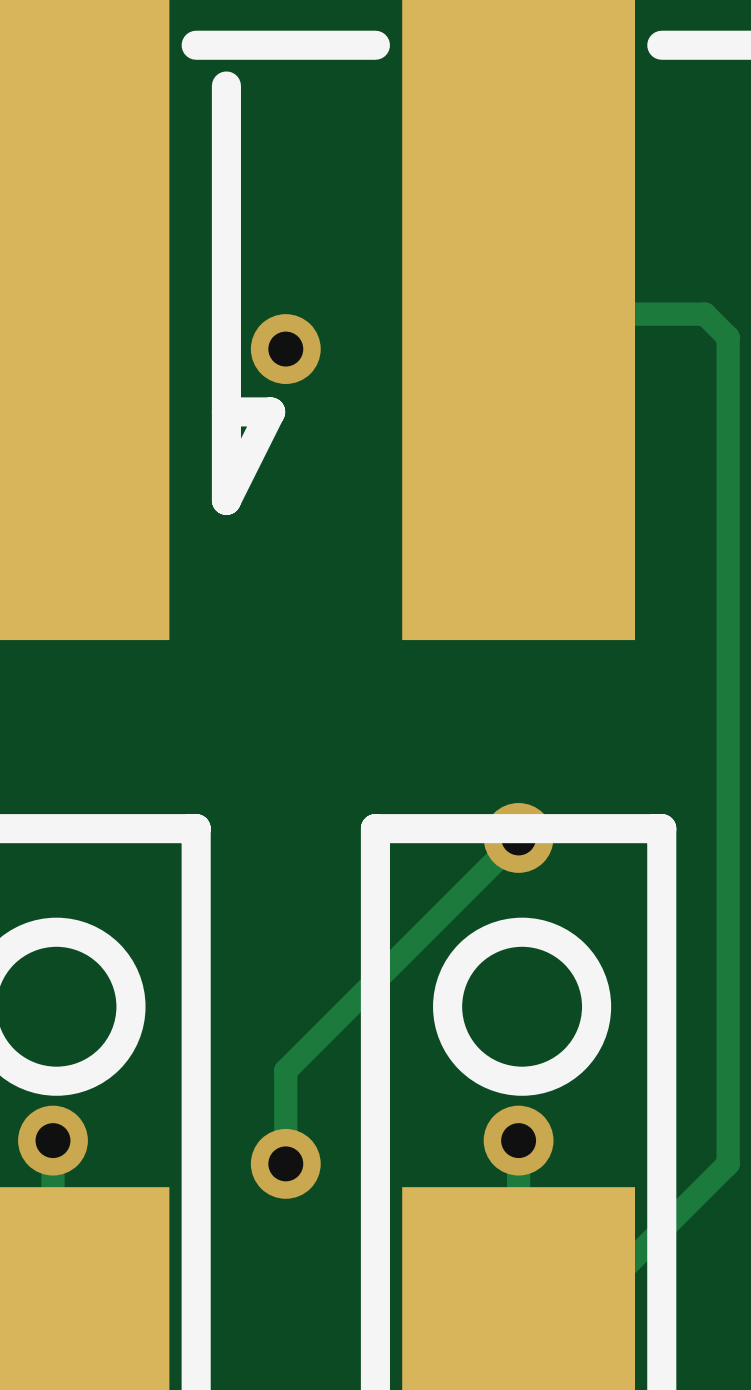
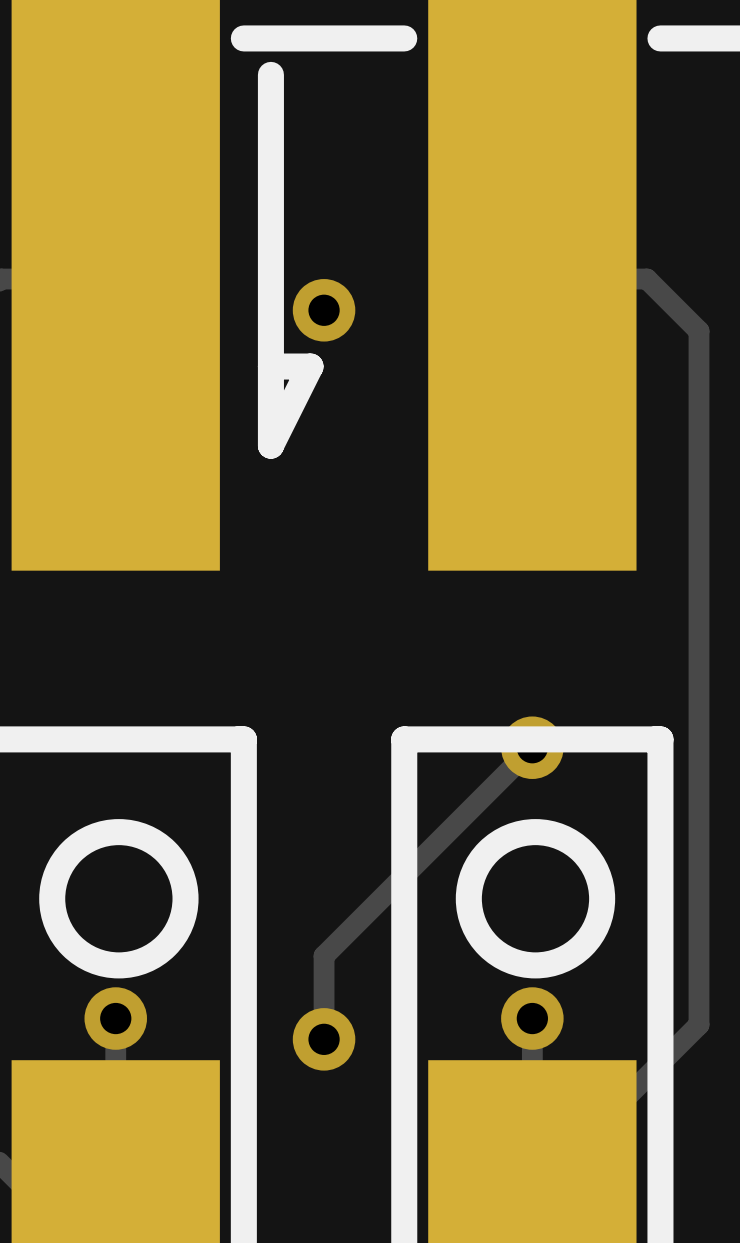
track: (646, 314) (704, 314) (728, 337) (728, 1163) (576, 1315) (537, 1315) -> (646, 279) (699, 331) (699, 1024) (549, 1174)

